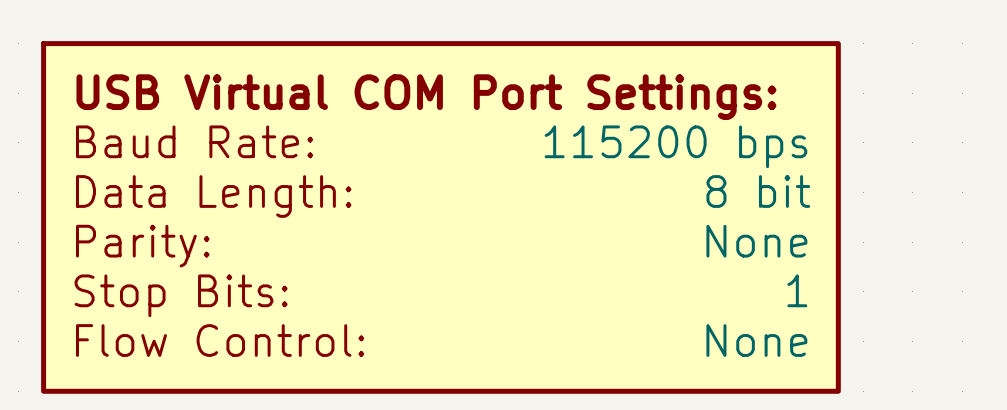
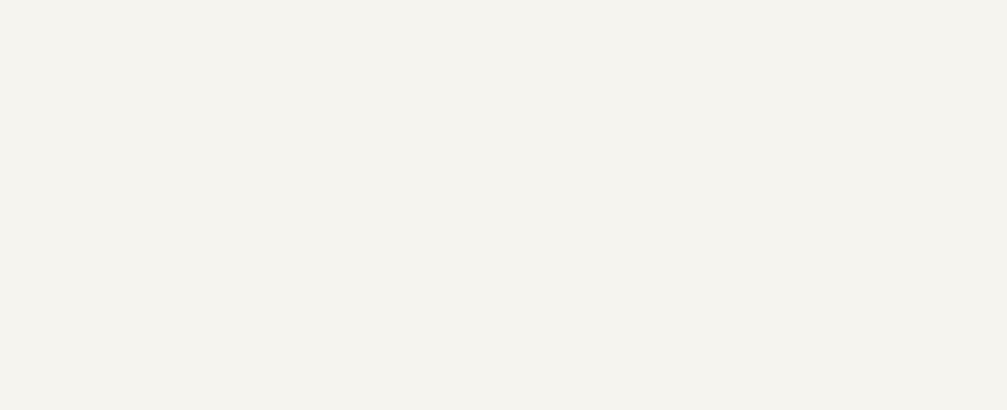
part: (440, 217) -> none

